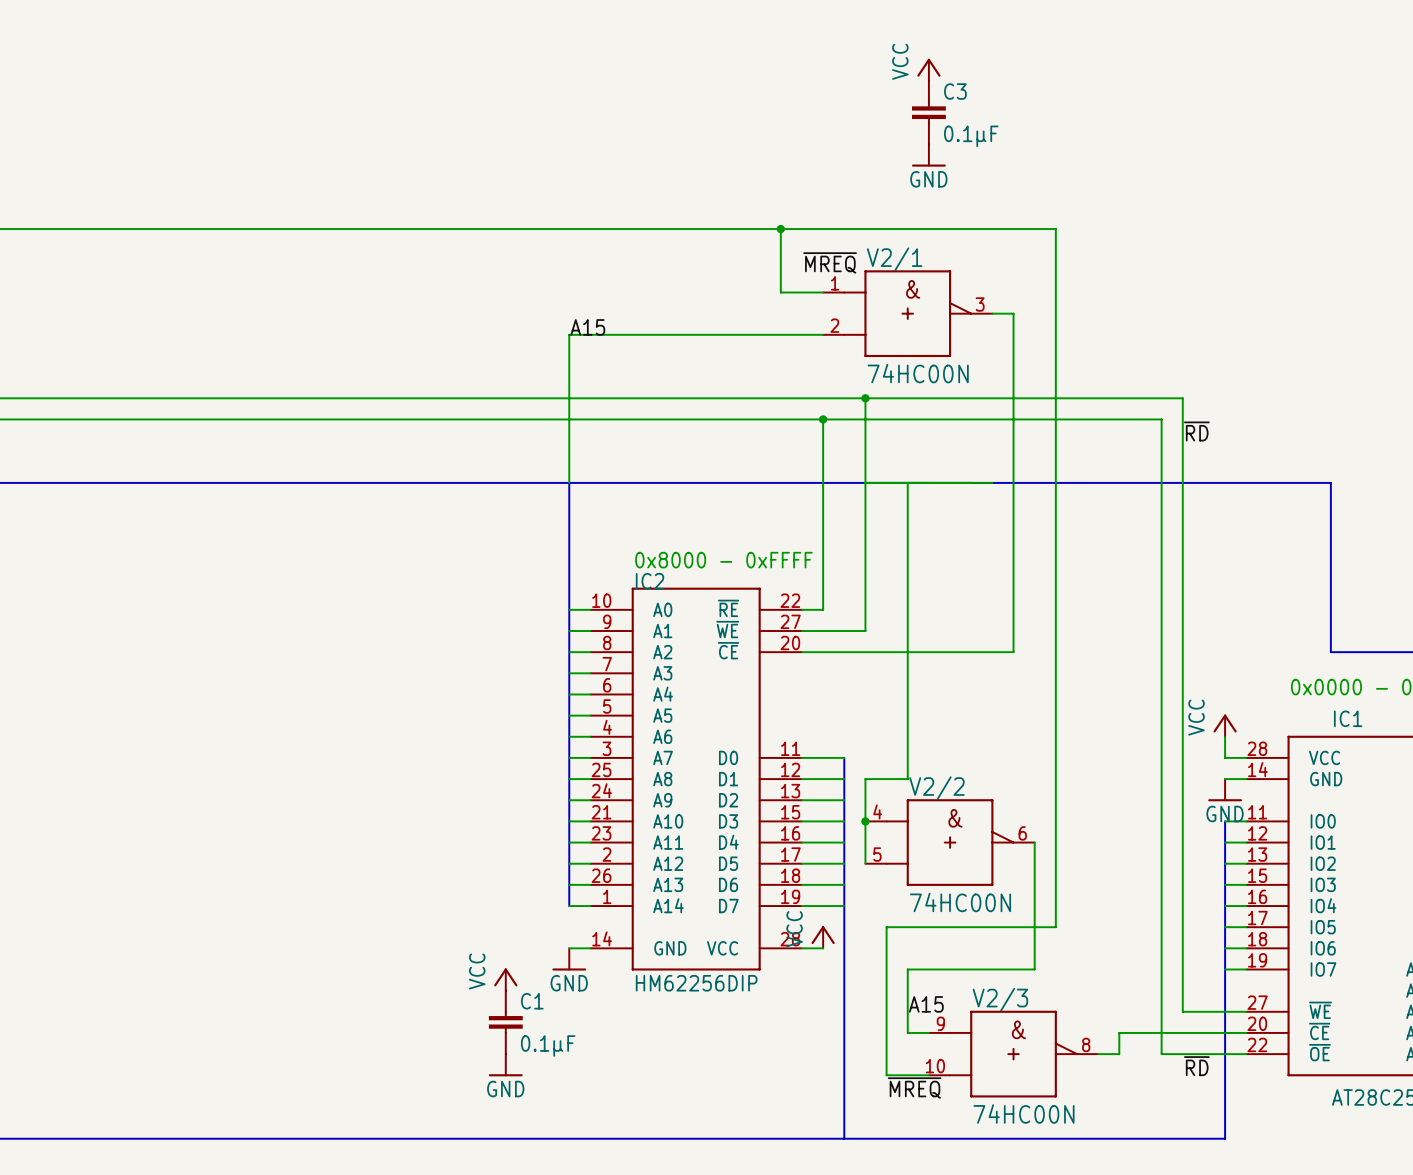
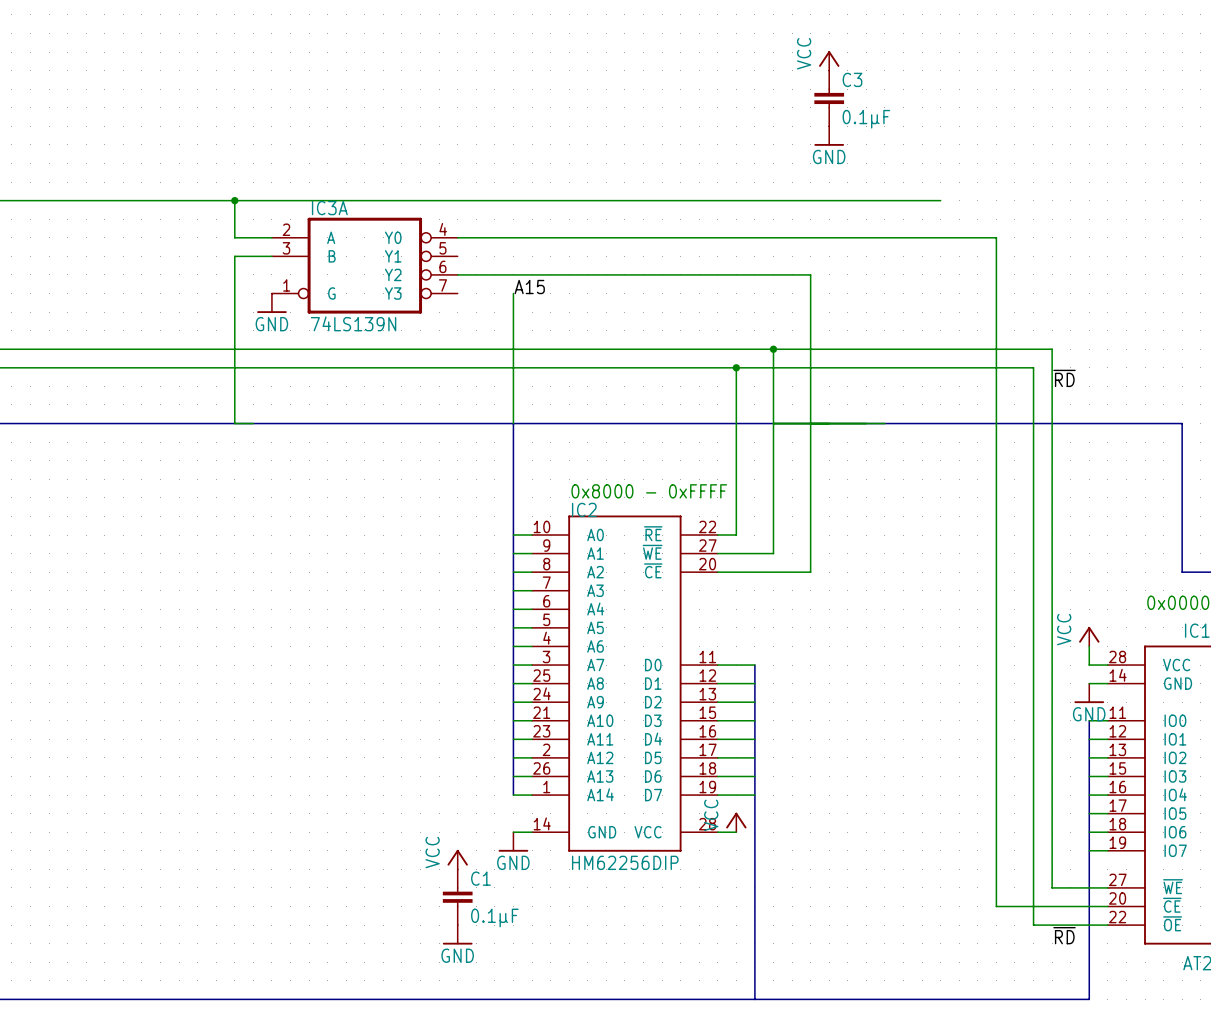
wire: none -> (234, 200) (234, 237) (271, 237)
junction: none -> (234, 200)
wire: (780, 229) (780, 292) (823, 292) -> none
junction: (780, 229) -> none
wire: (1055, 229) (1055, 927) (886, 927) (886, 1075) (928, 1075) -> none
label: ~{MREQ} (830, 262) -> none
wire: none -> (271, 256) (234, 256) (234, 423) (253, 423)
IC3A: none -> 74LS139N (364, 265)
wire: none -> (457, 274) (810, 274) (810, 423)
V2/1: 74HC00N (907, 313) -> none
wire: (992, 313) (1013, 313) (1013, 652) (907, 652) (907, 779) (865, 779) (865, 863) -> none
wire: (569, 334) (823, 334) -> none
power symbol: none -> GND (271, 303)
junction: (865, 821) -> none
V2/2: 74HC00N (950, 842) -> none
wire: (1034, 842) (1034, 969) (907, 969) (907, 1032) (928, 1032) -> none
label: A15 (926, 1004) -> none
wire: (1119, 1032) (1119, 1054) (1098, 1054) -> (996, 906) (996, 237) (457, 237)
V2/3: 74HC00N (1013, 1054) -> none
label: ~{MREQ} (914, 1088) -> none

